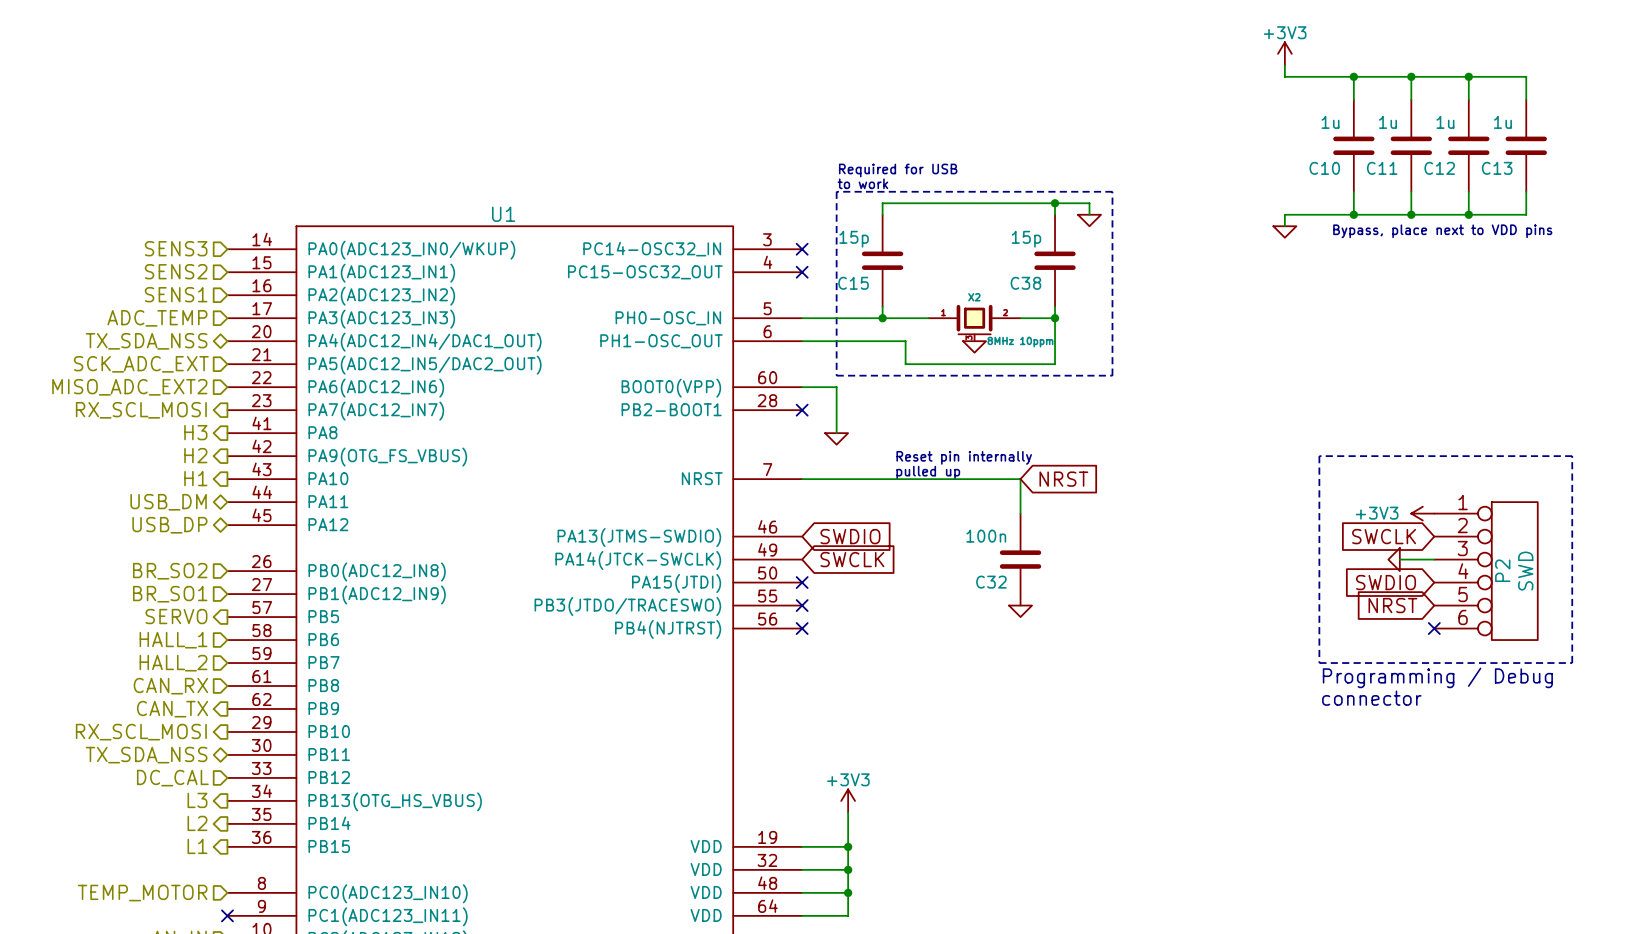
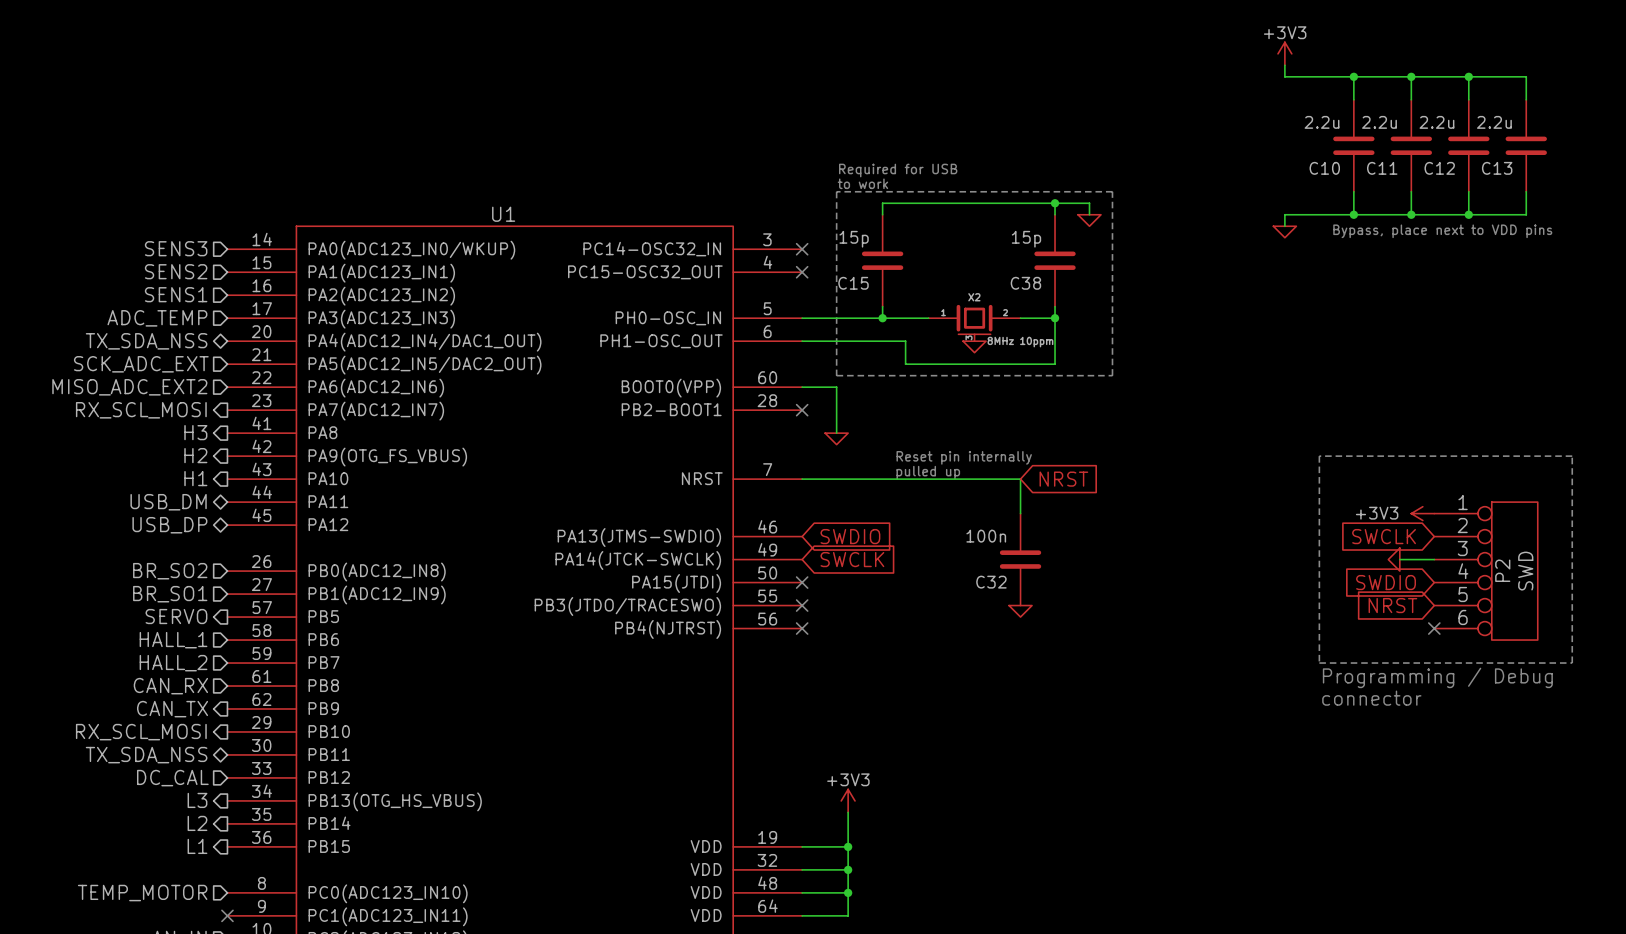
C10 value: 1u (1330, 122) -> 2.2u (1322, 122)
C11 value: 1u (1387, 122) -> 2.2u (1379, 122)
C12 value: 1u (1445, 122) -> 2.2u (1436, 122)
C13 value: 1u (1502, 122) -> 2.2u (1494, 122)

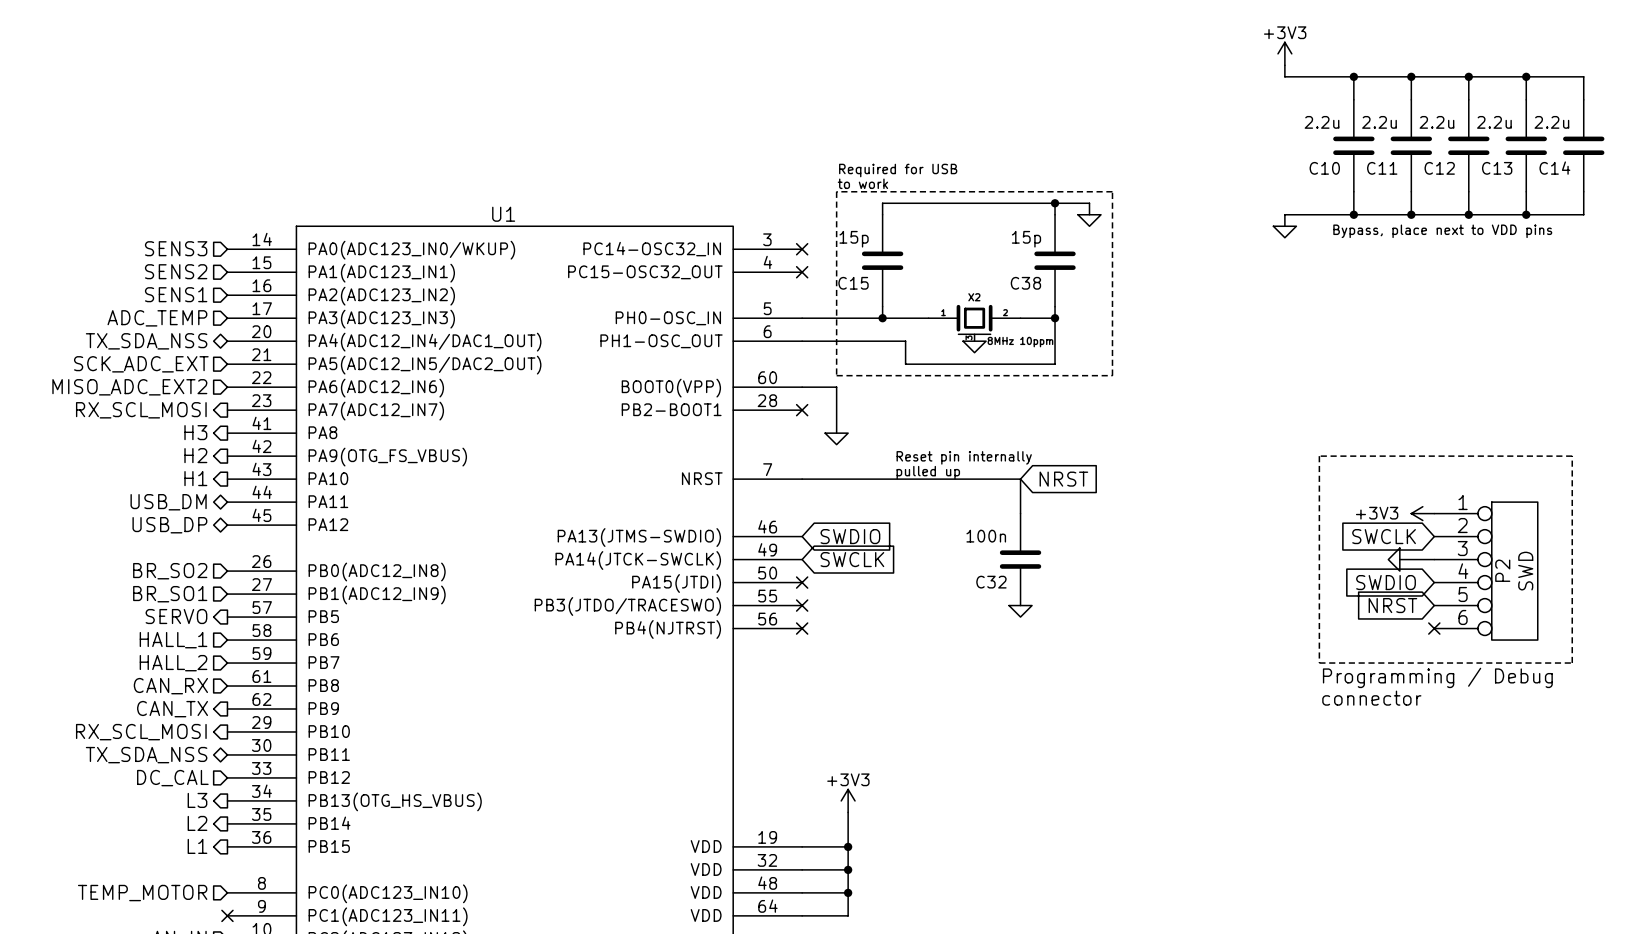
wire: none -> (1526, 76) (1583, 76) (1583, 99)
junction: none -> (1526, 76)
C14: none -> 2.2u (1583, 145)
wire: none -> (1583, 191) (1583, 214) (1526, 214)
junction: none -> (1526, 214)

